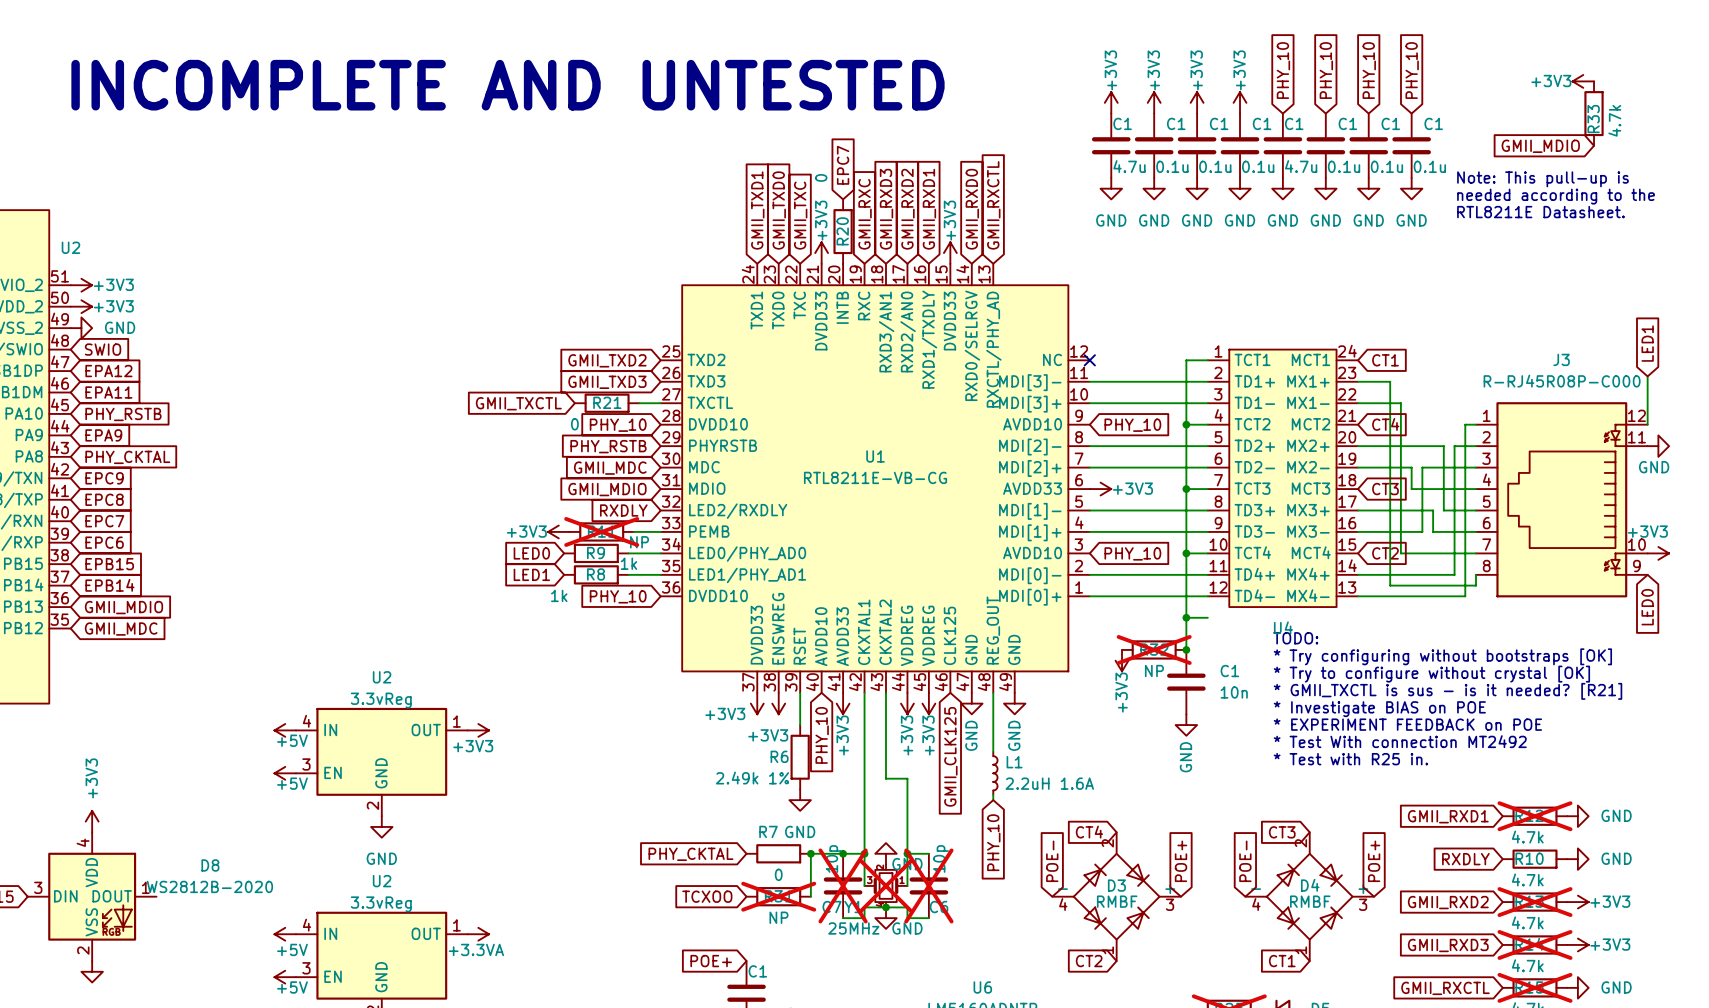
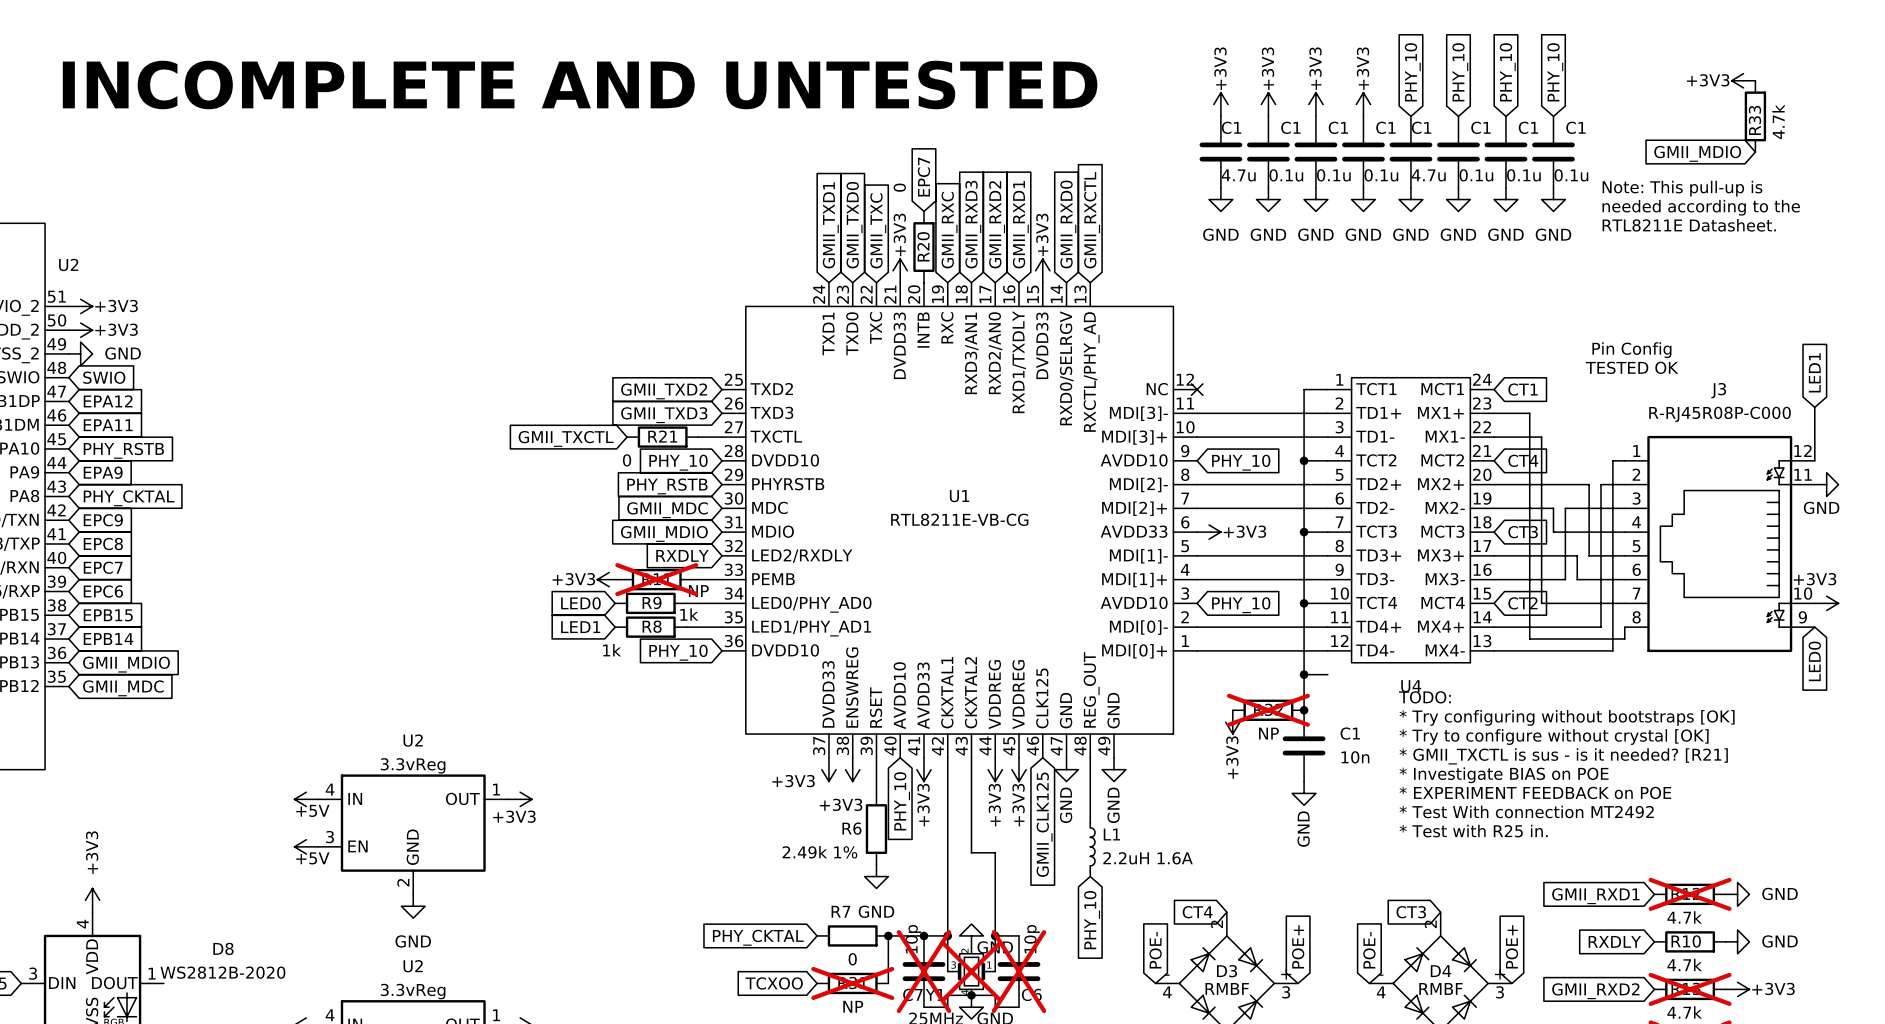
text: none -> Pin Config (1631, 350)
text: none -> TESTED OK (1632, 367)

